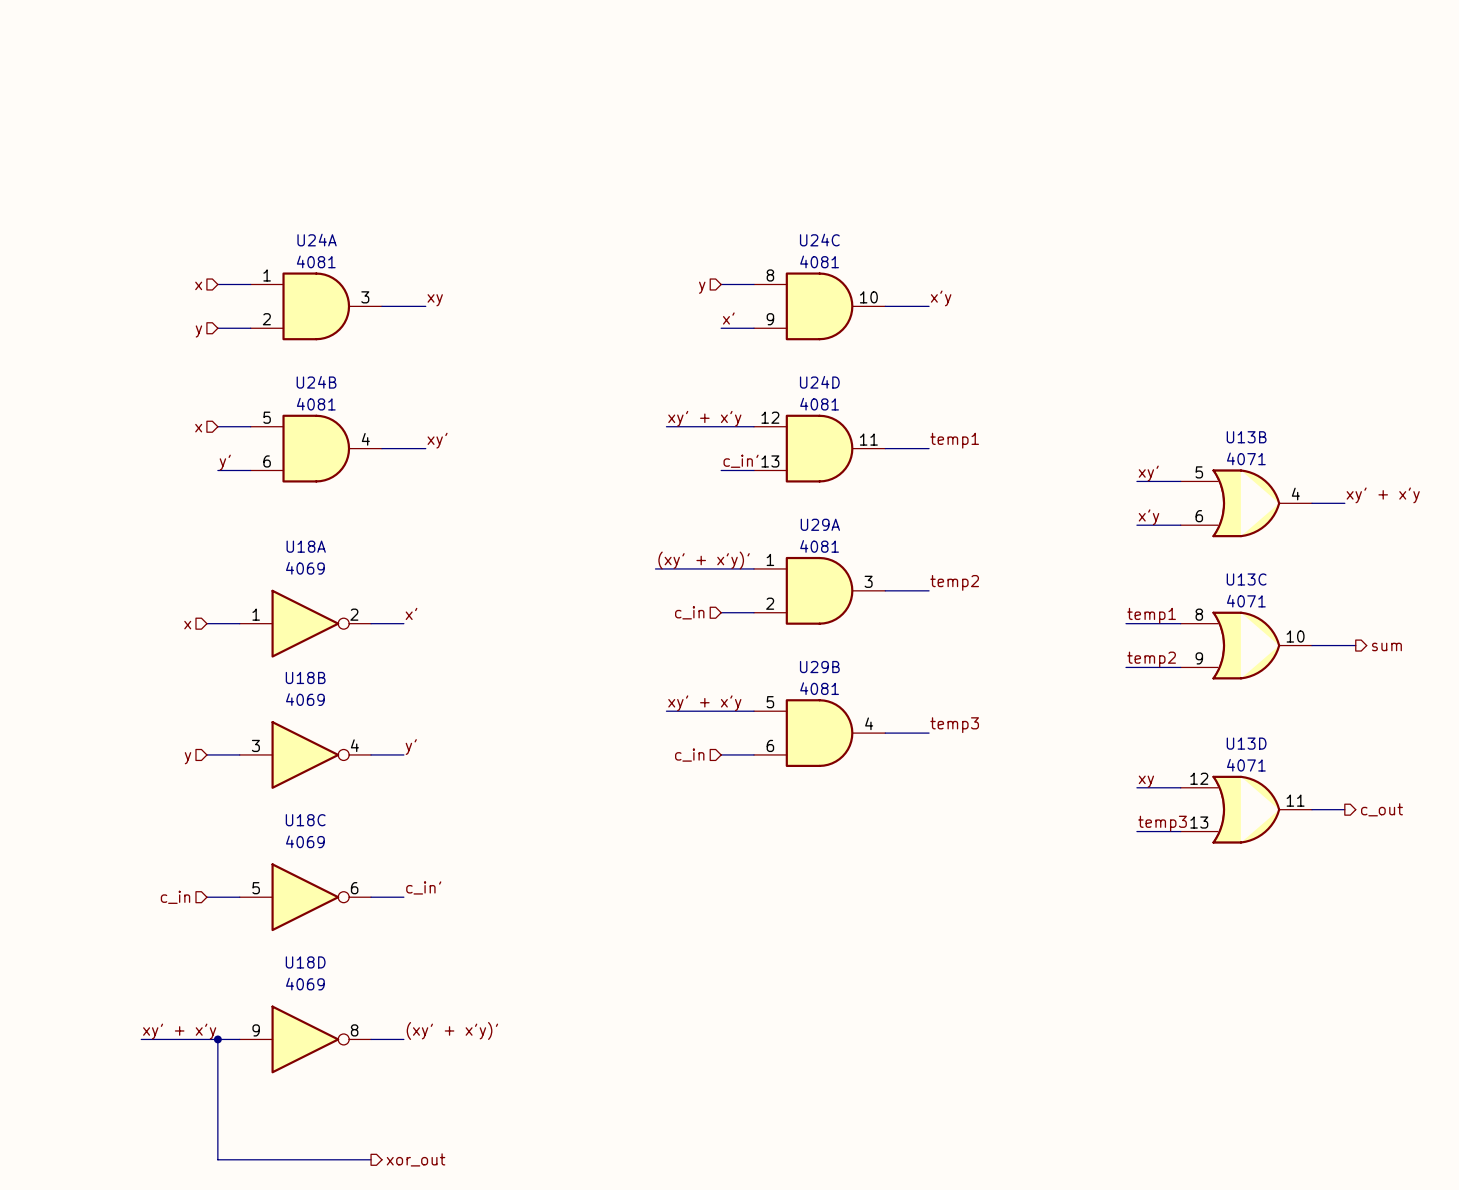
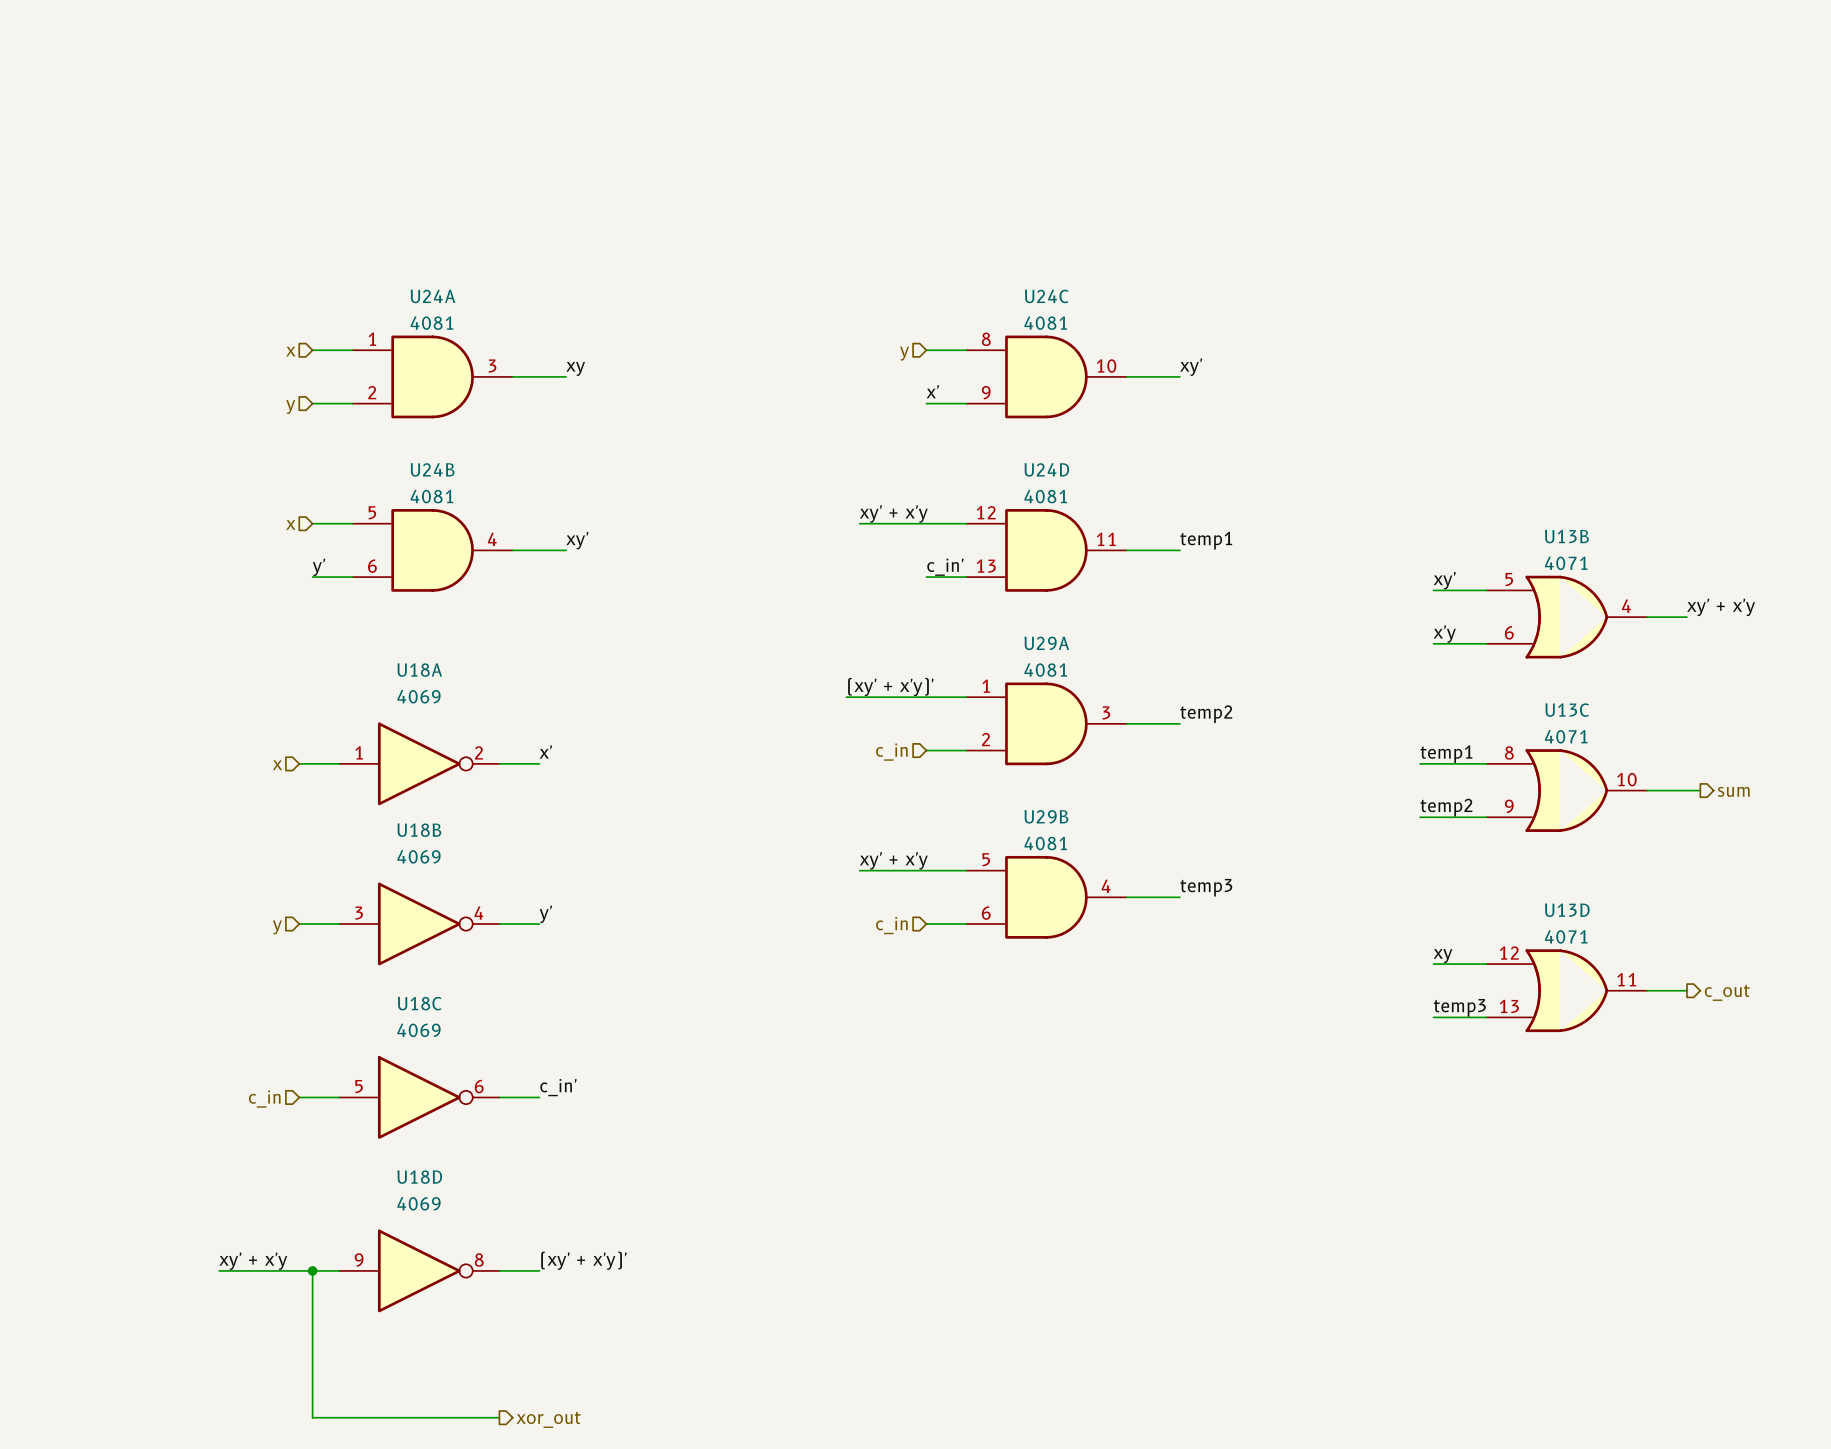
label: x'y (941, 298) -> xy' (1191, 367)

